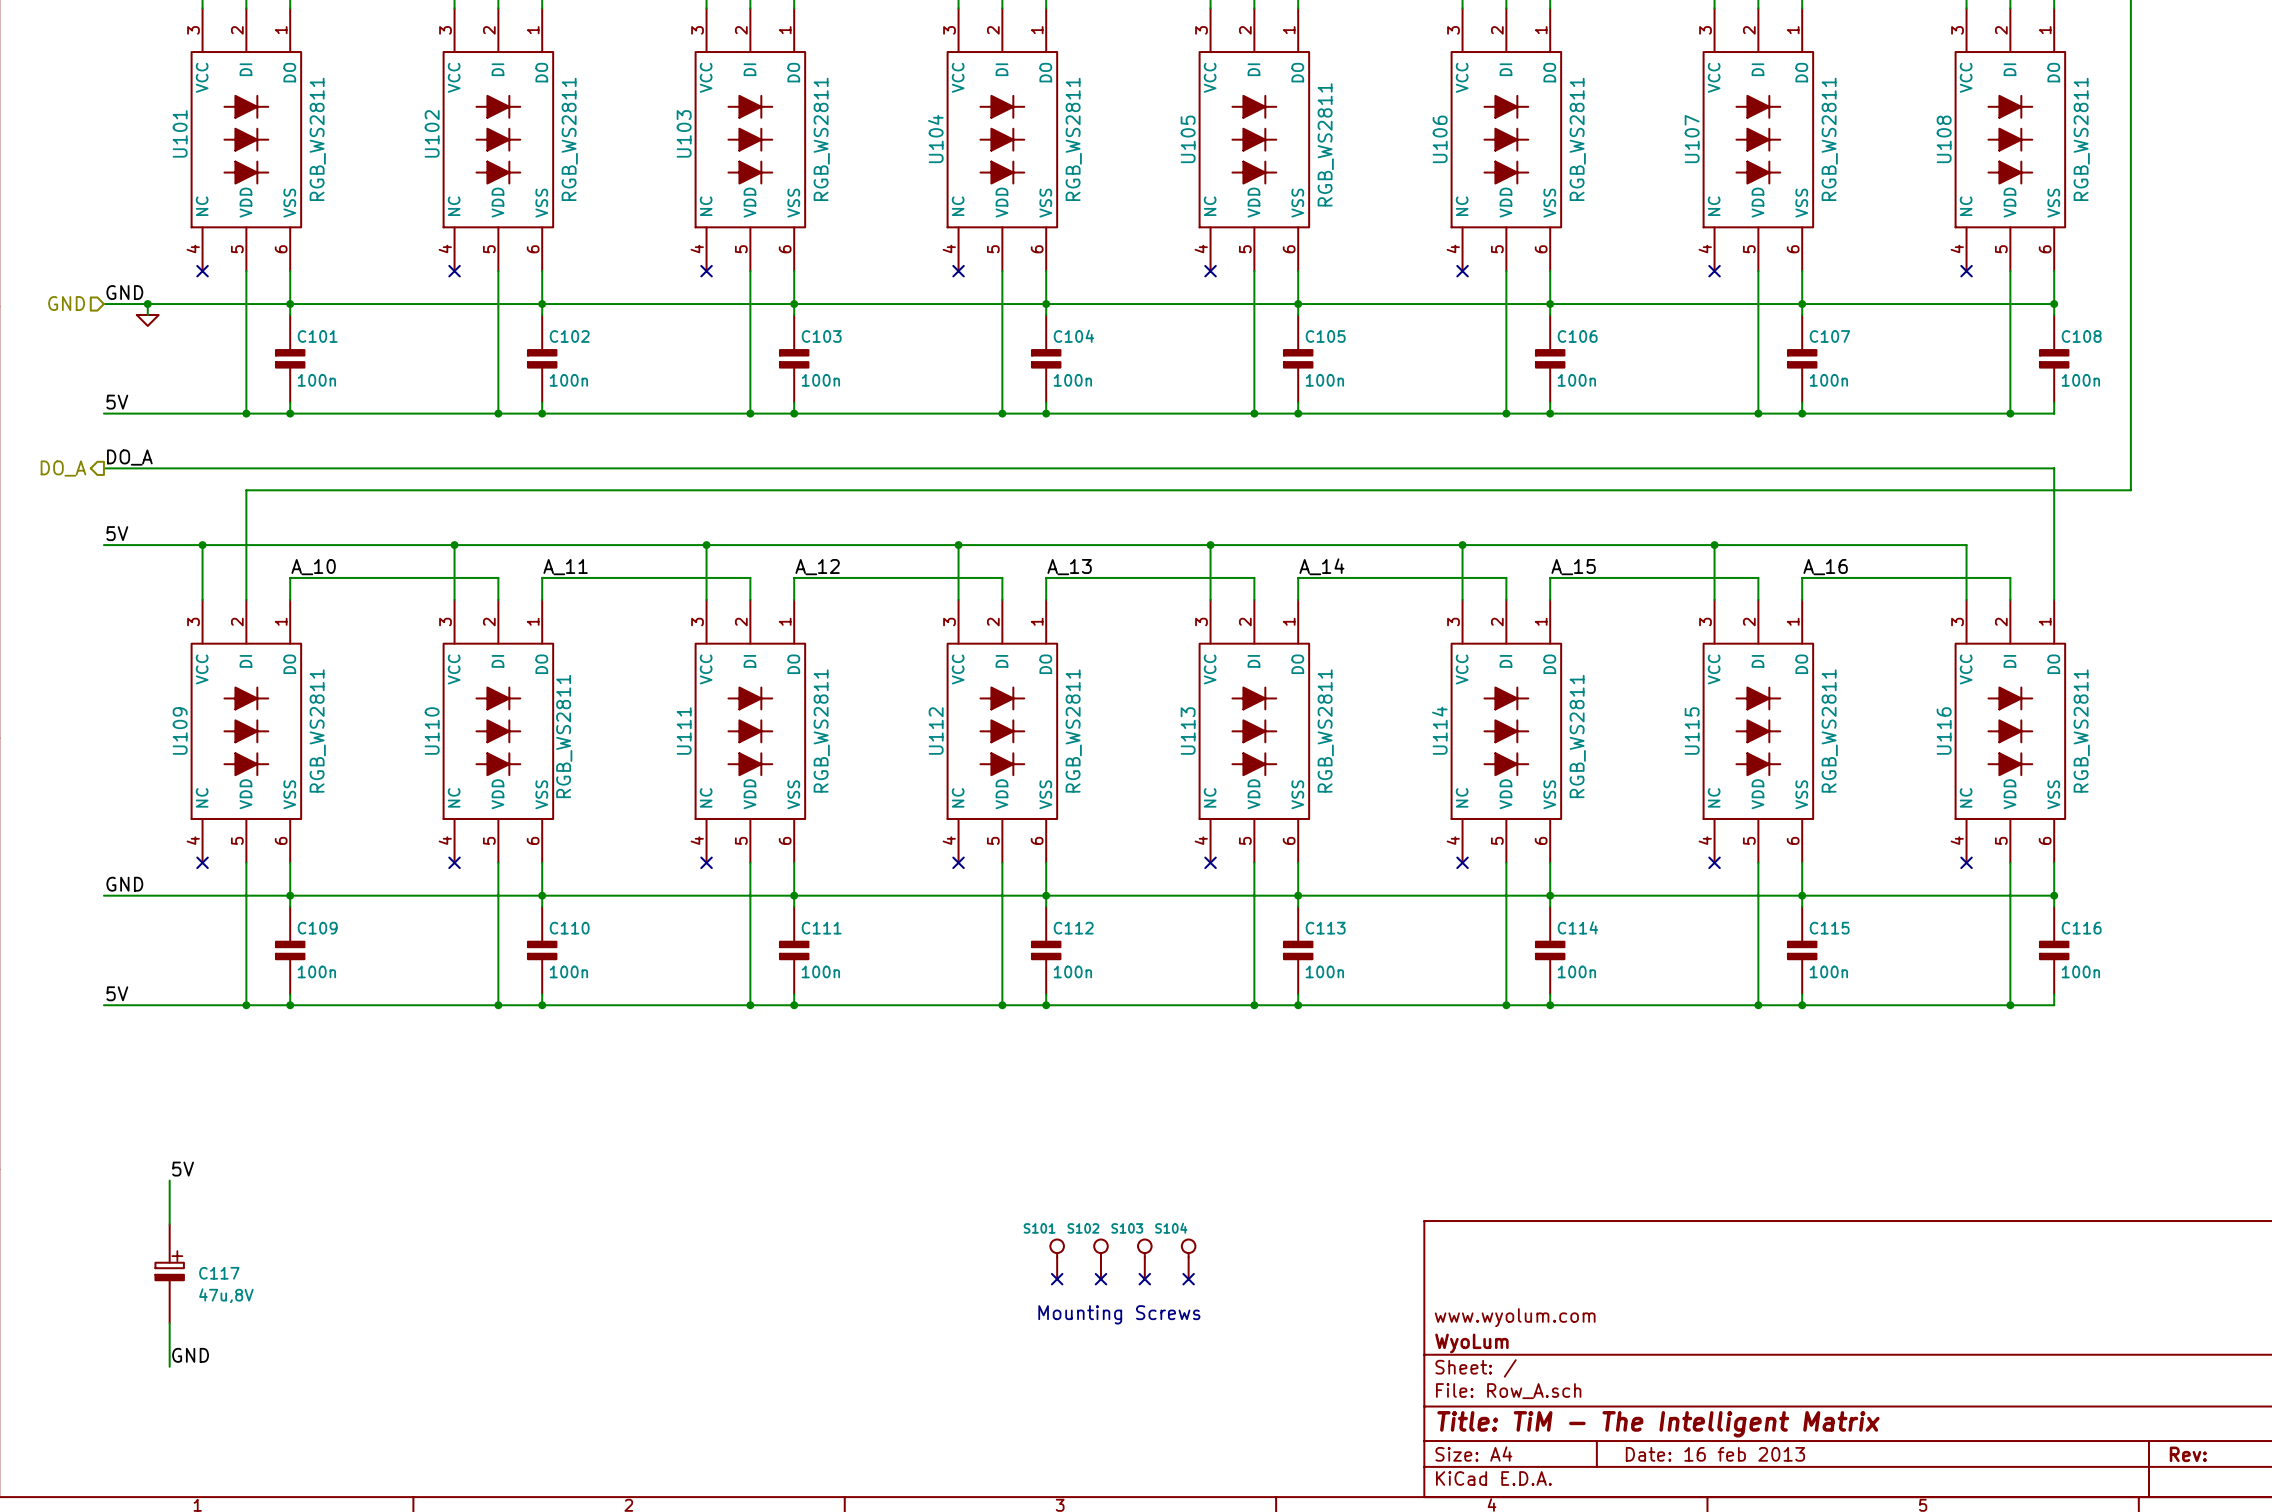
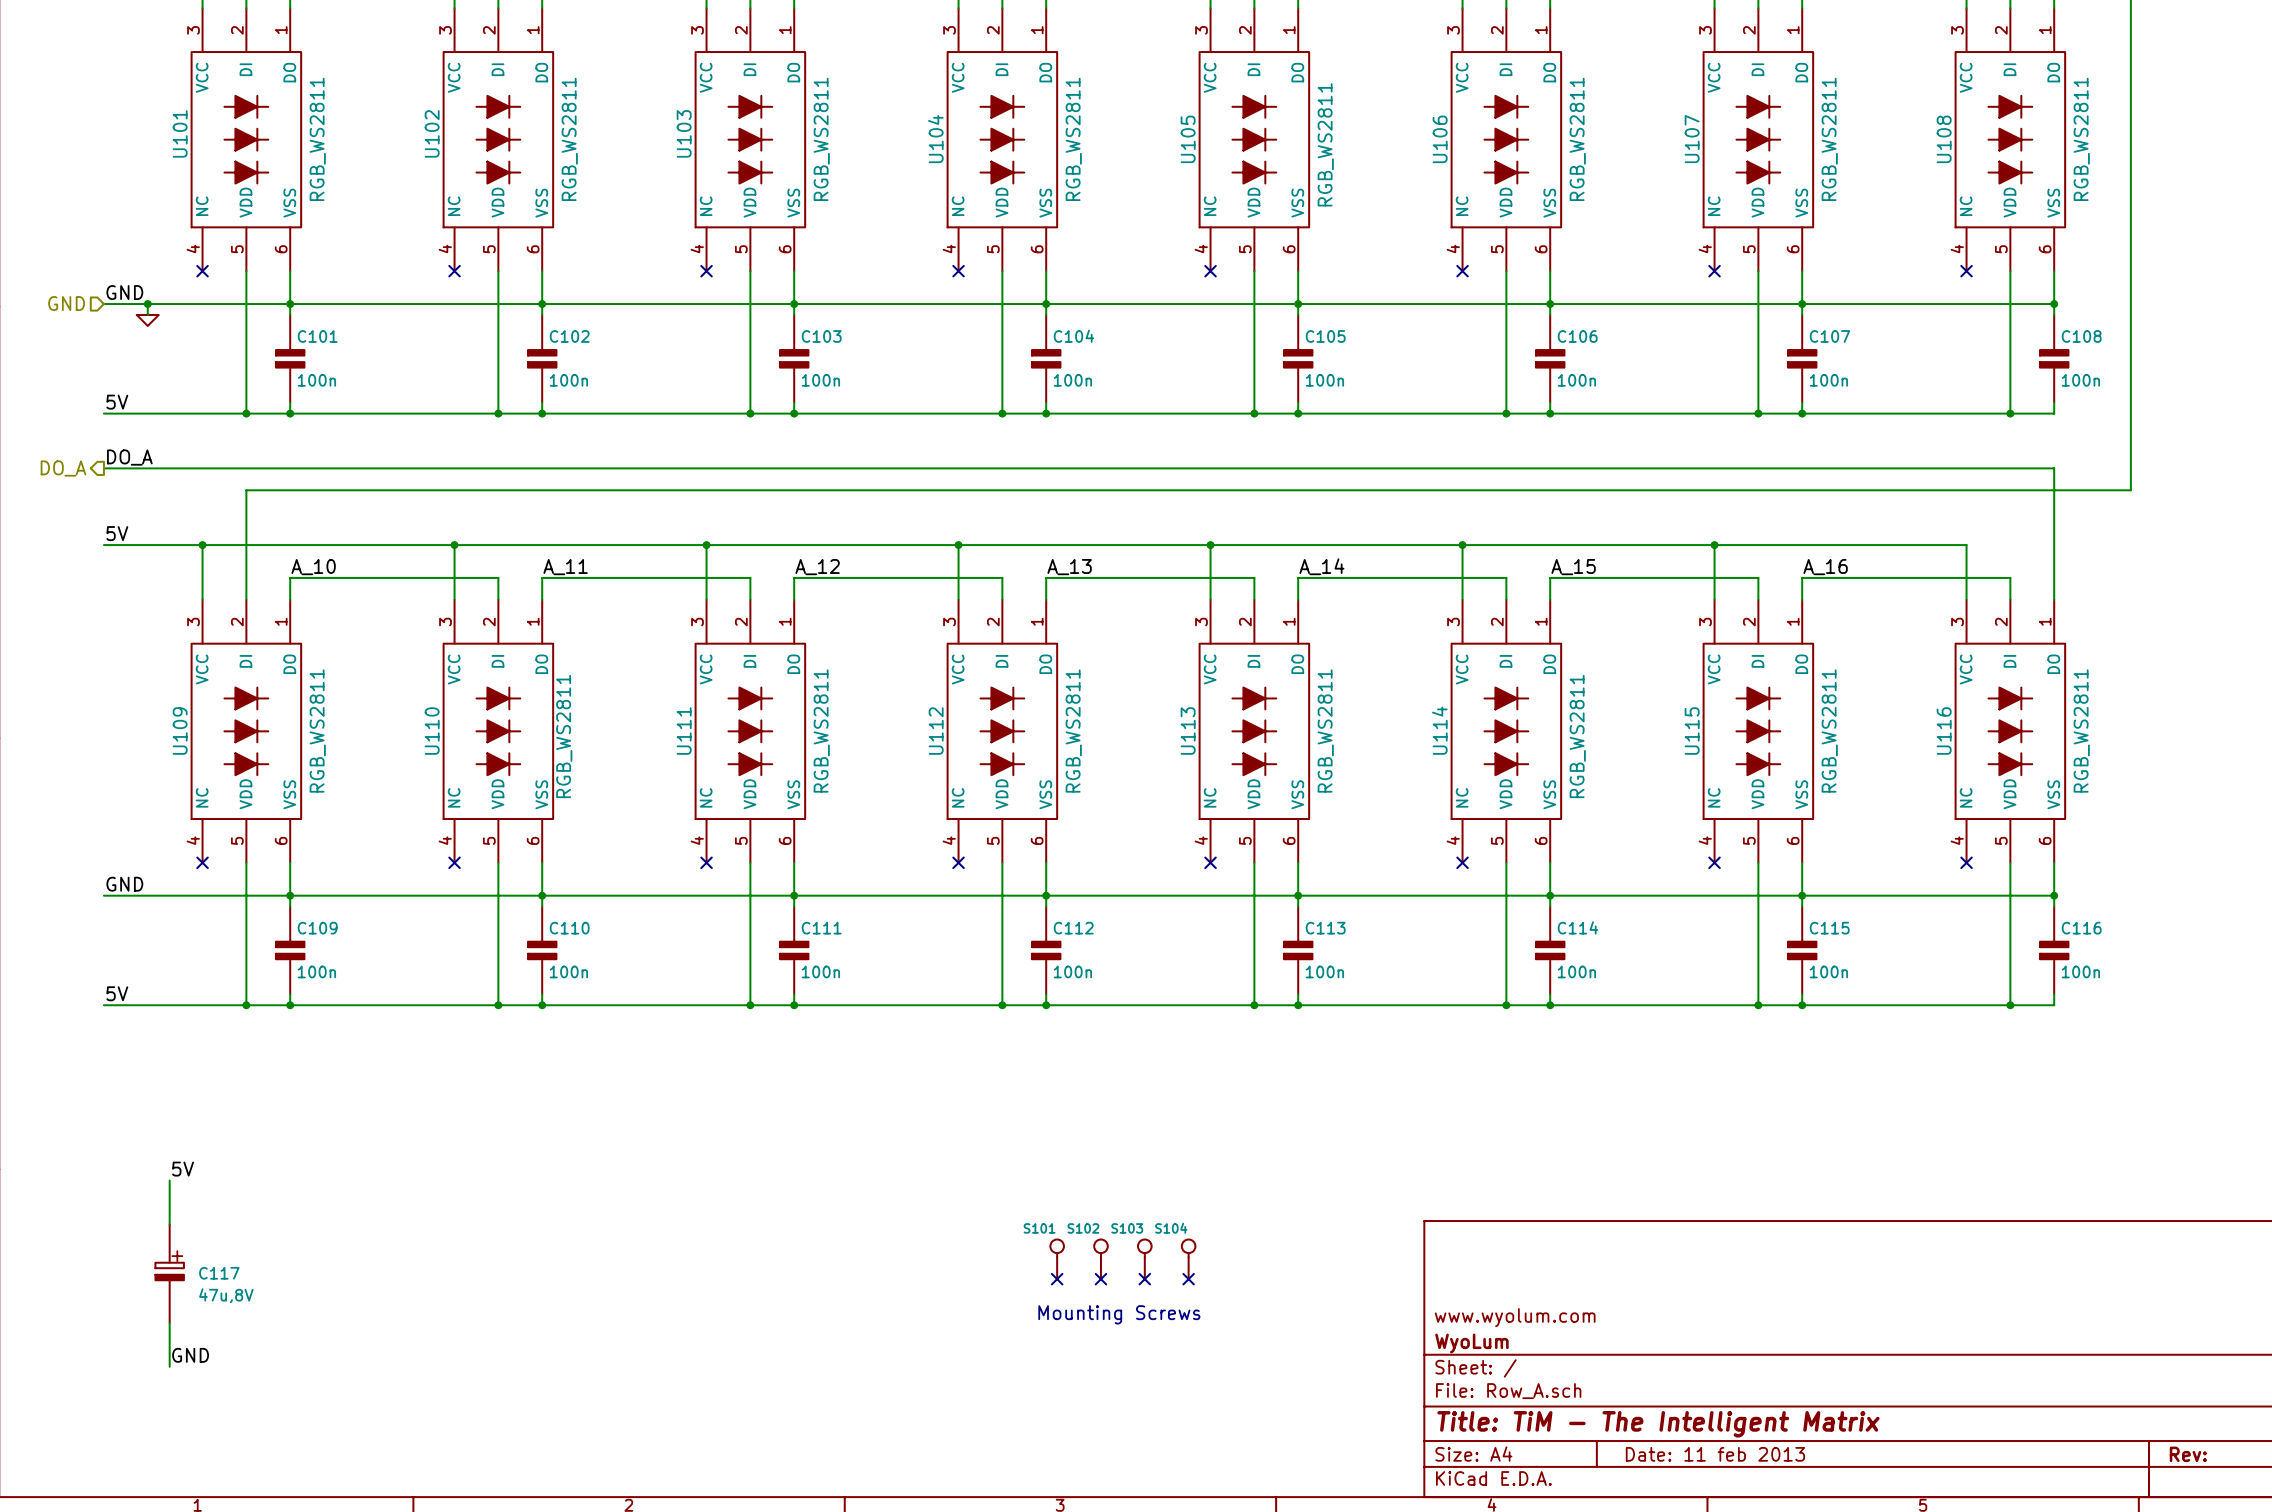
title block: Date: 16 feb 2013 (1715, 1454) -> Date: 11 feb 2013 (1715, 1454)

